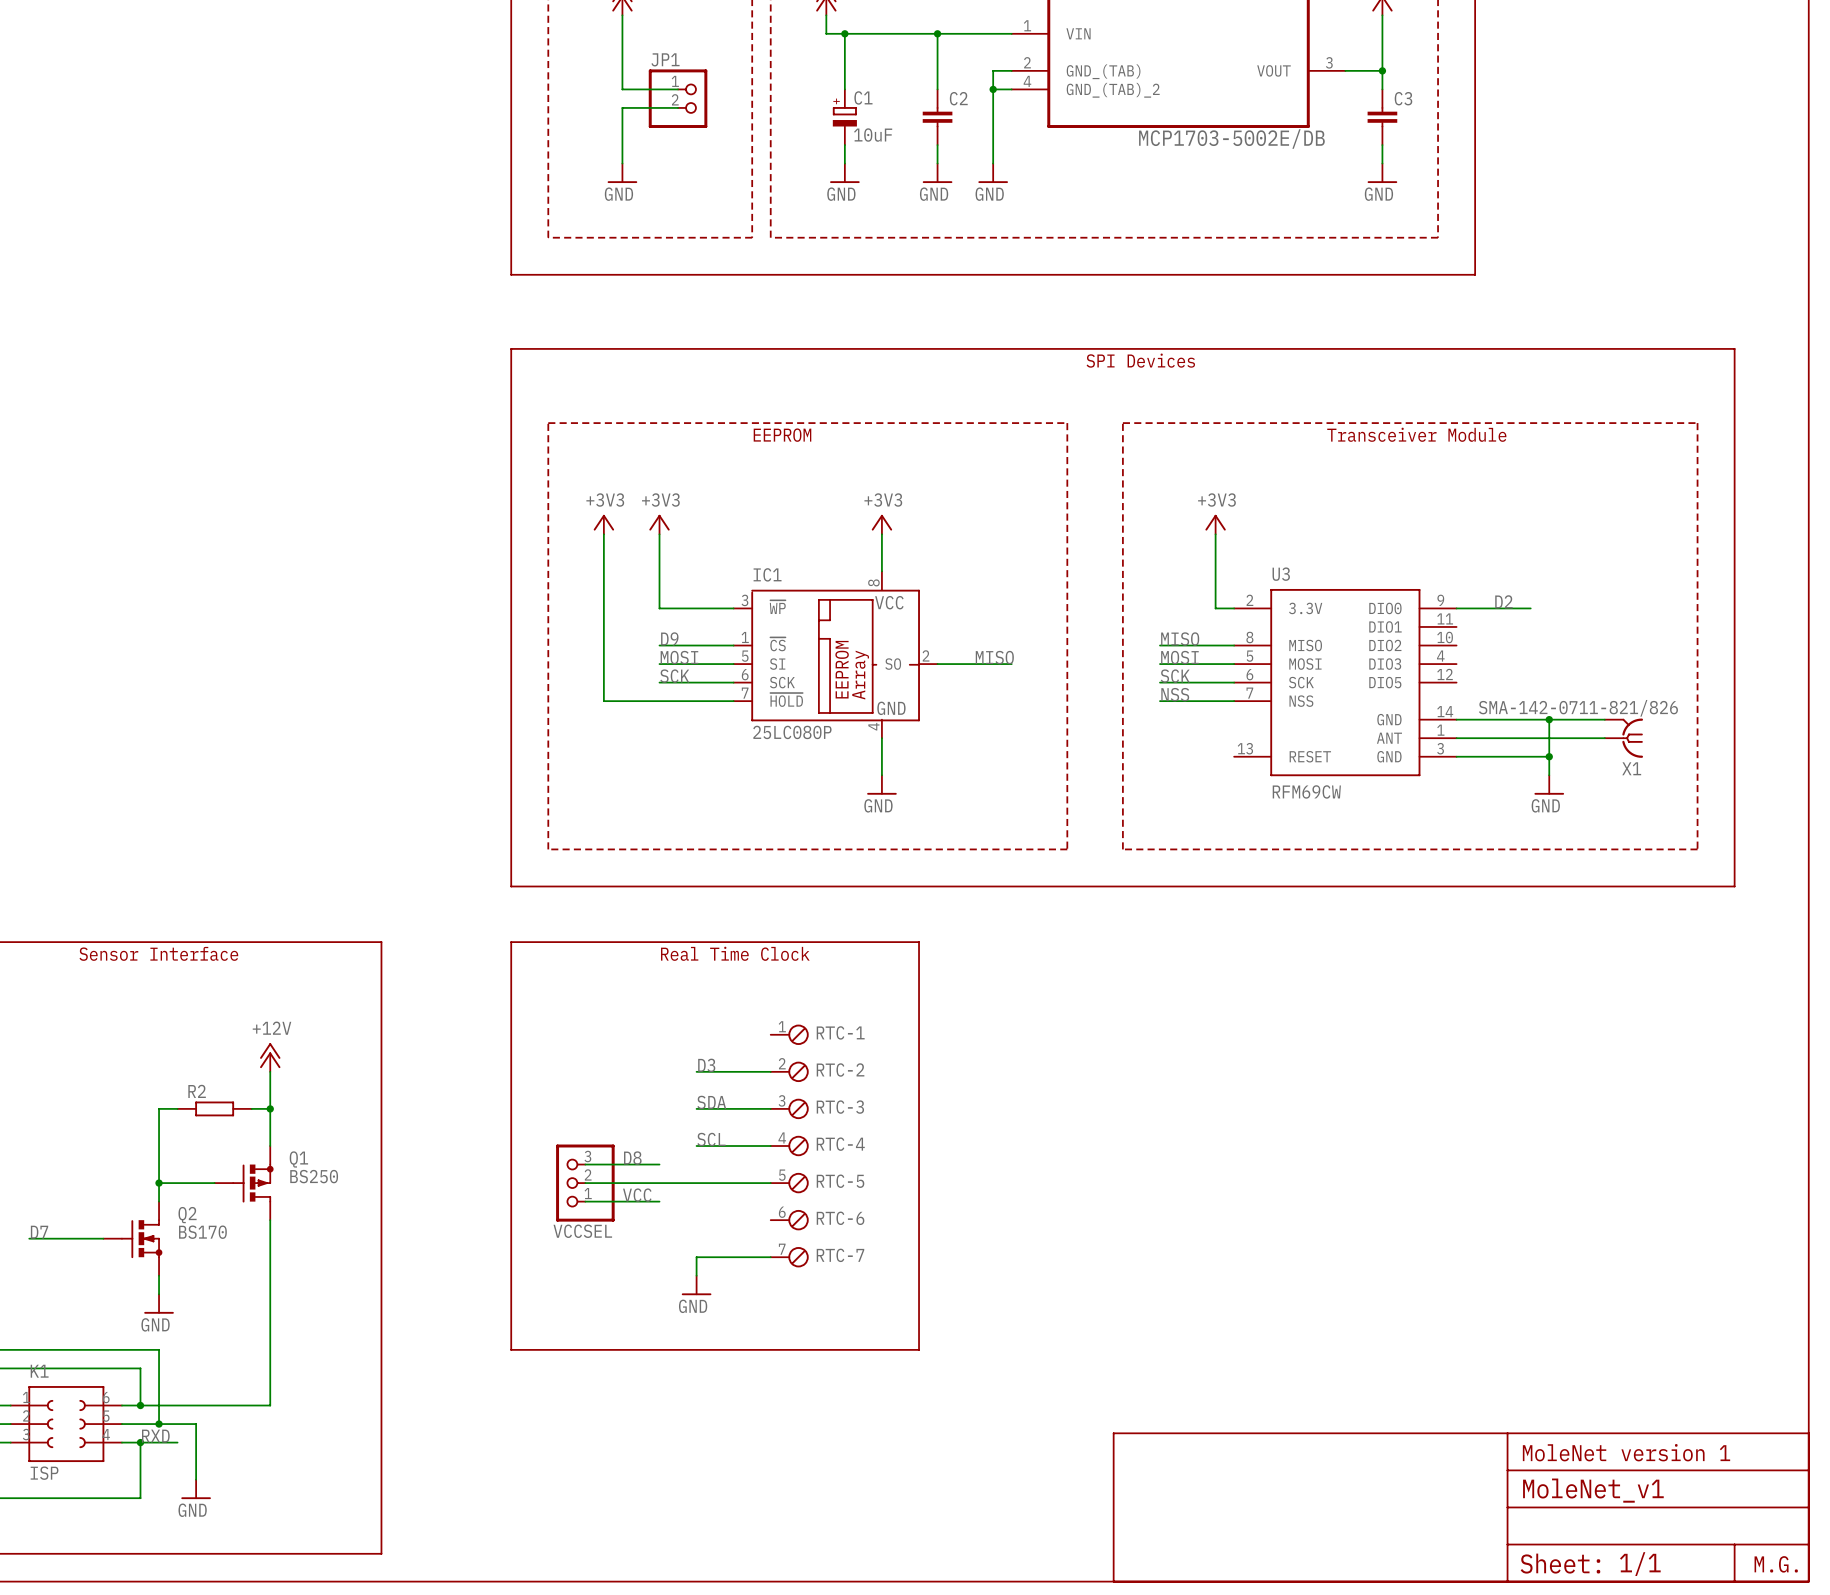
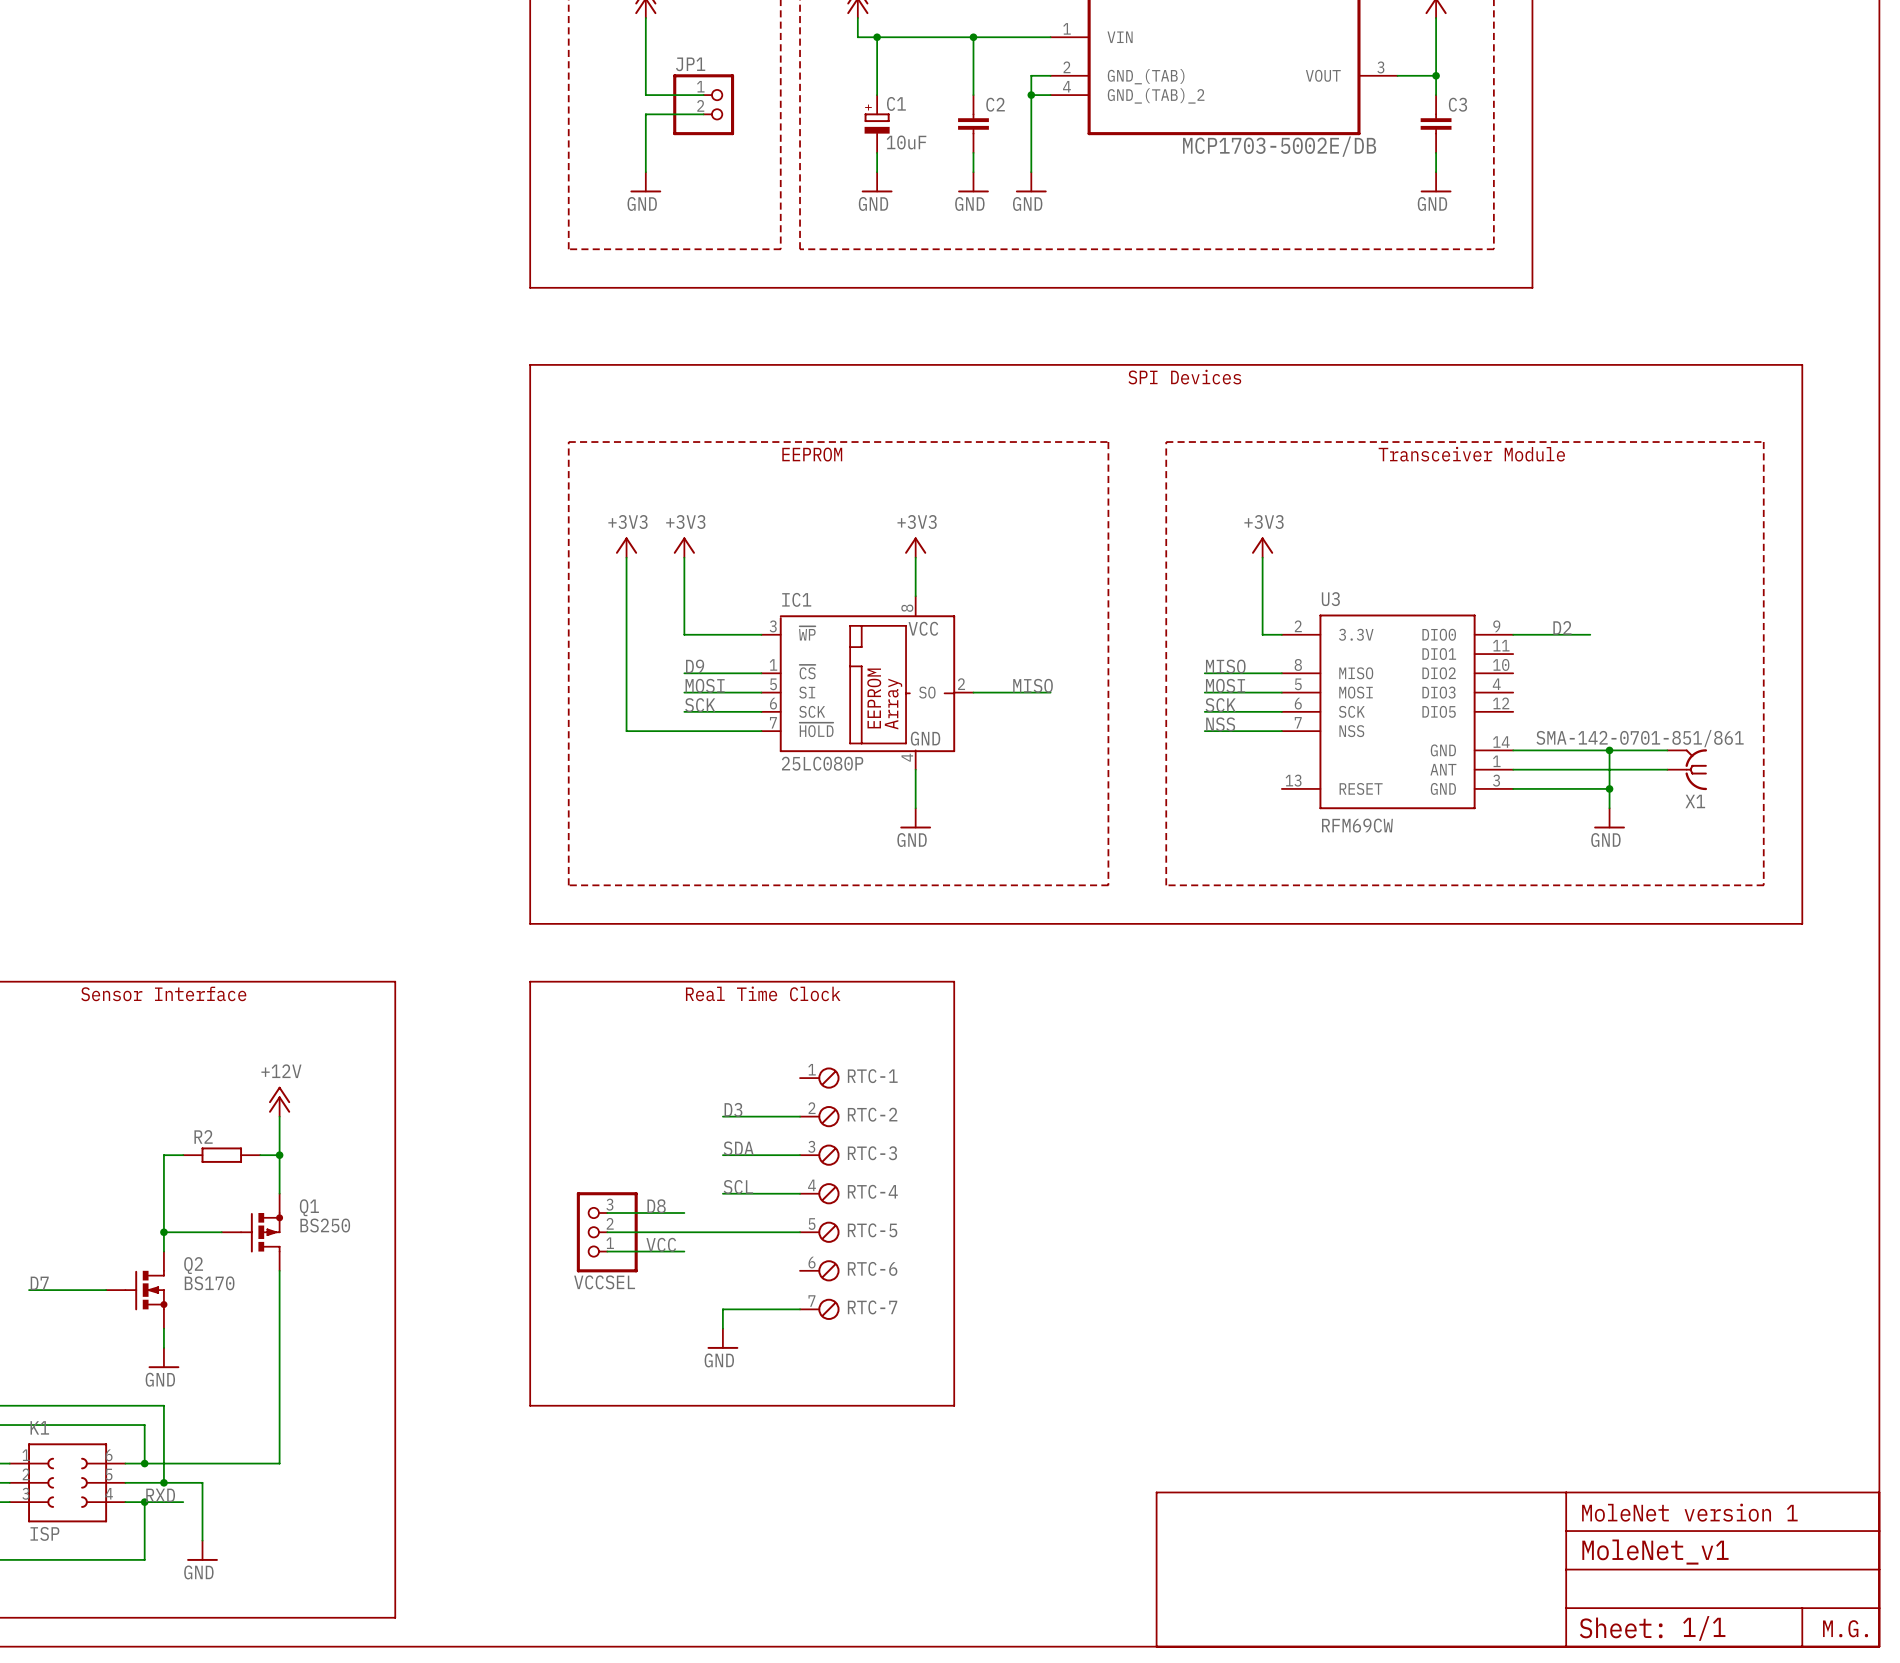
X1 value: SMA-142-0711-821/826 (1578, 708) -> SMA-142-0701-851/861 (1640, 738)

